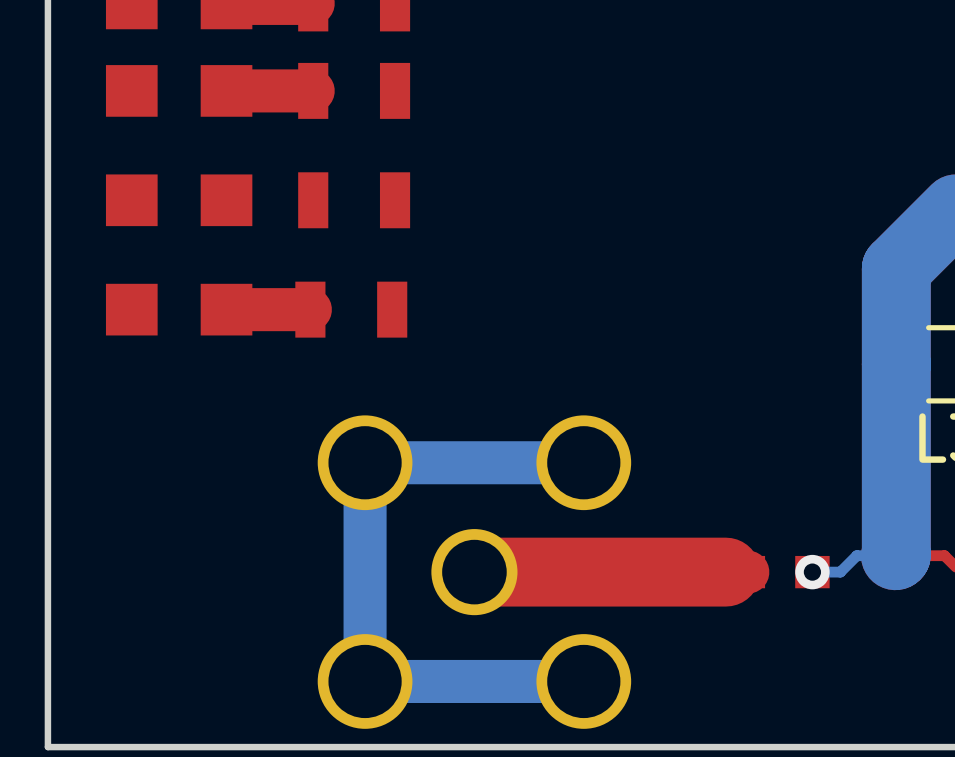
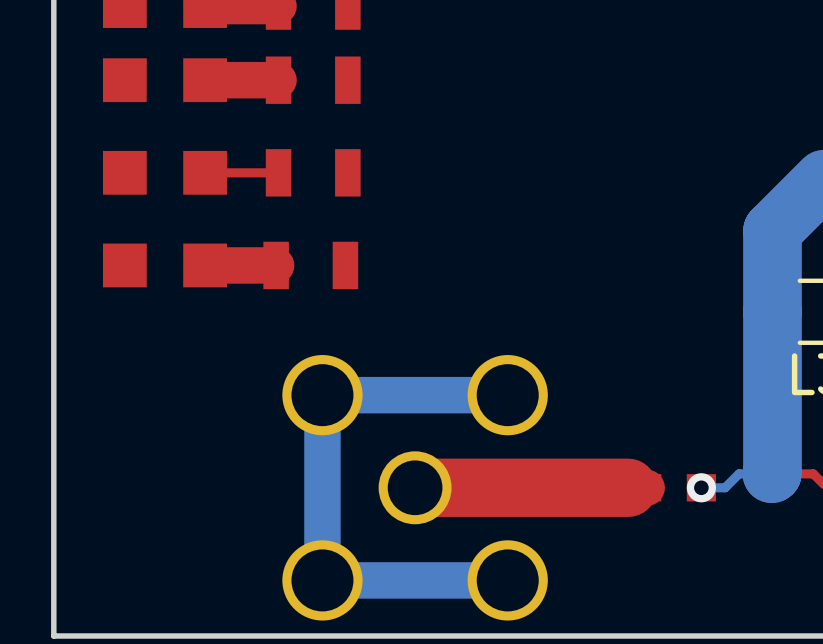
top track: none -> (278, 172) (205, 172)

